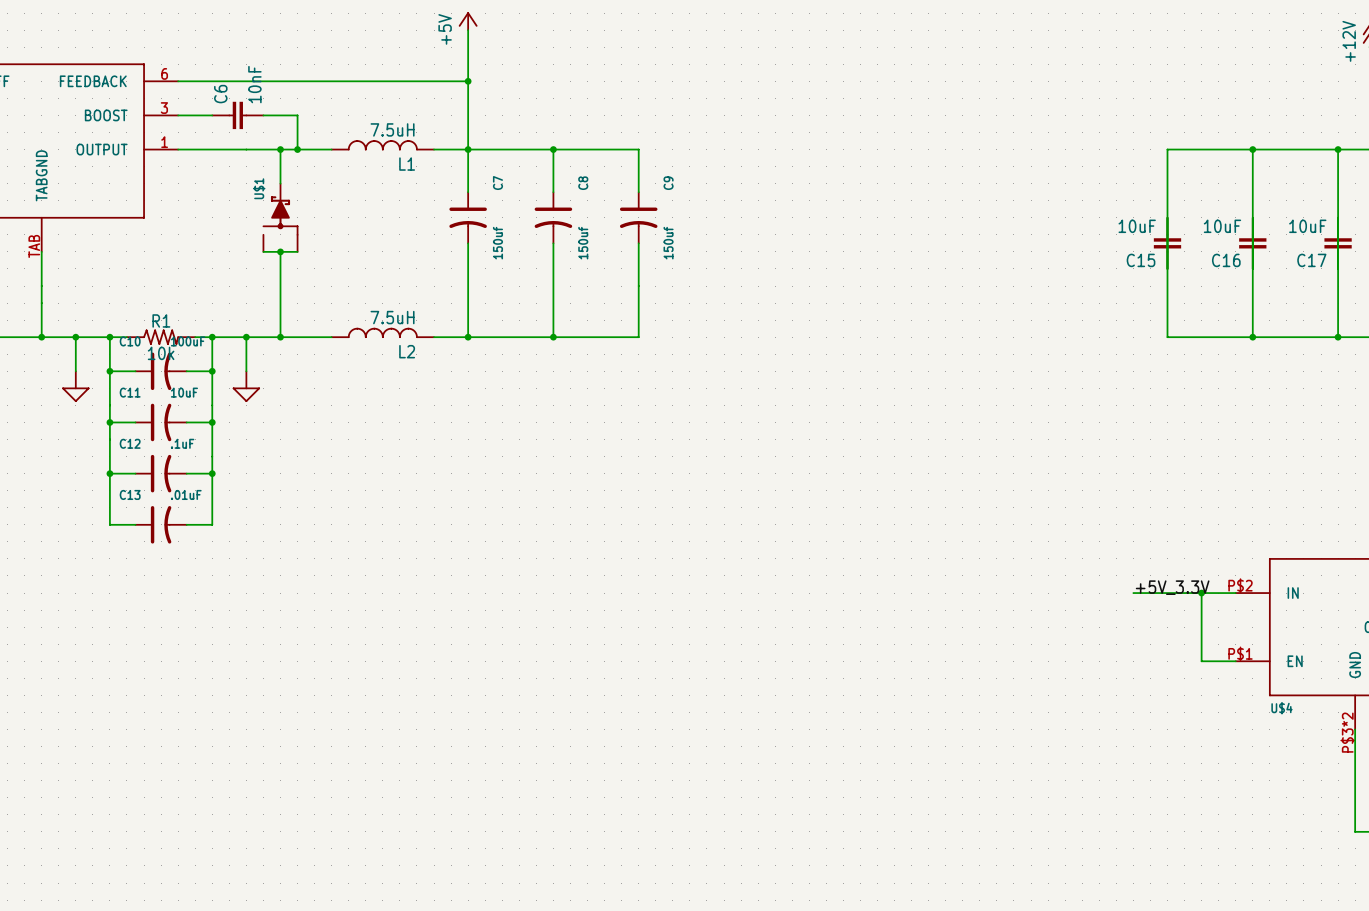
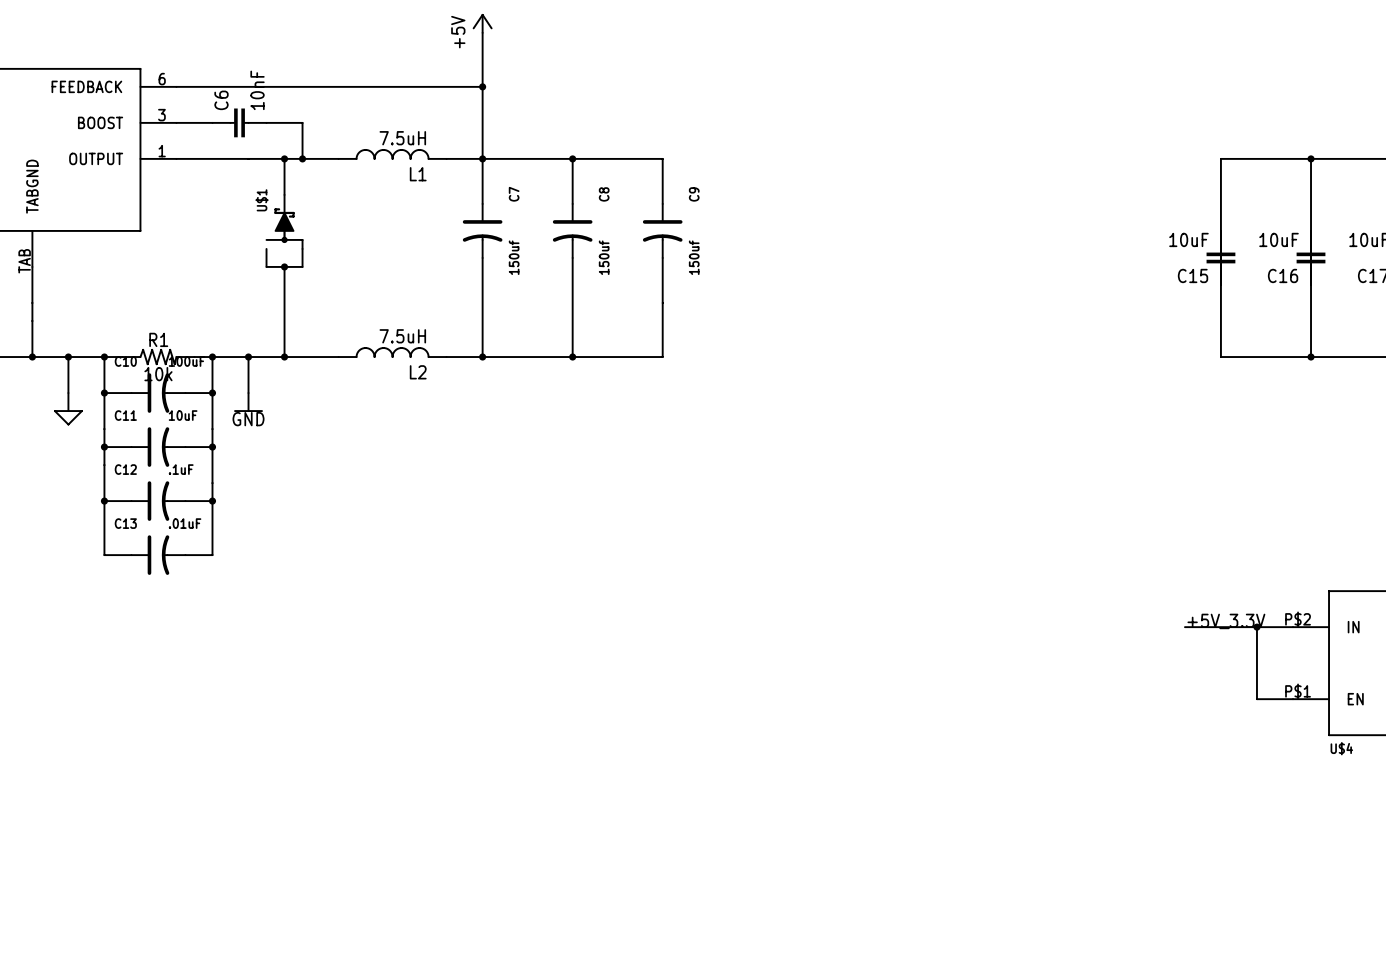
power symbol shape: [232, 371, 261, 403] -> [234, 393, 263, 412]
power symbol text: none -> GND (248, 419)

